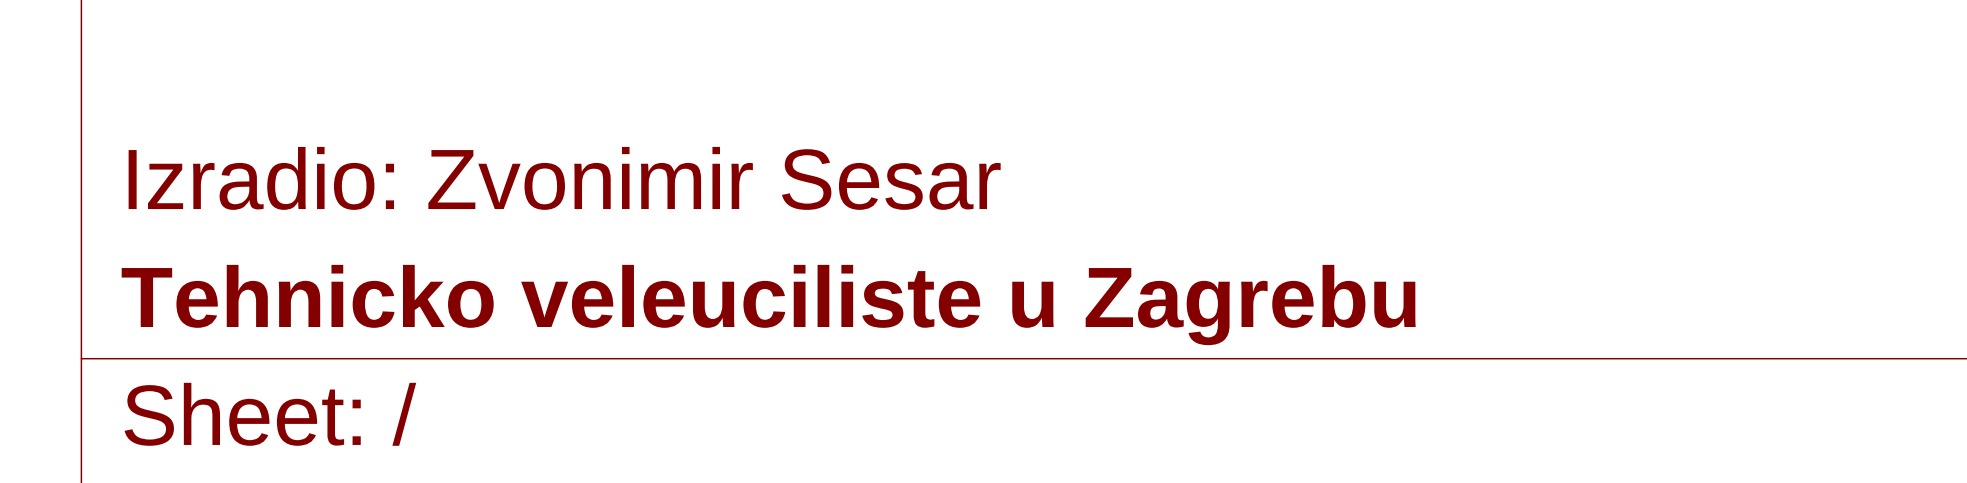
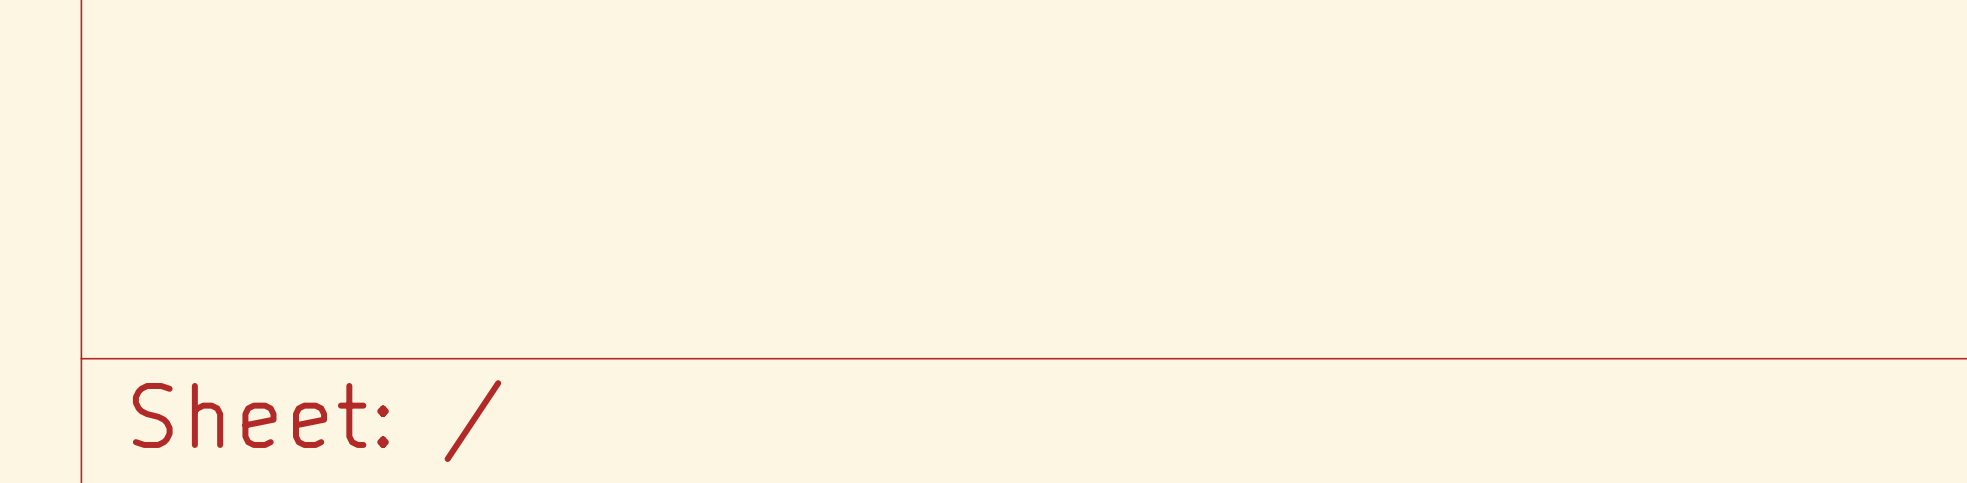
title block: Izradio: Zvonimir Sesar (564, 178) -> none
title block: Tehnicko veleuciliste u Zagrebu (768, 305) -> none

